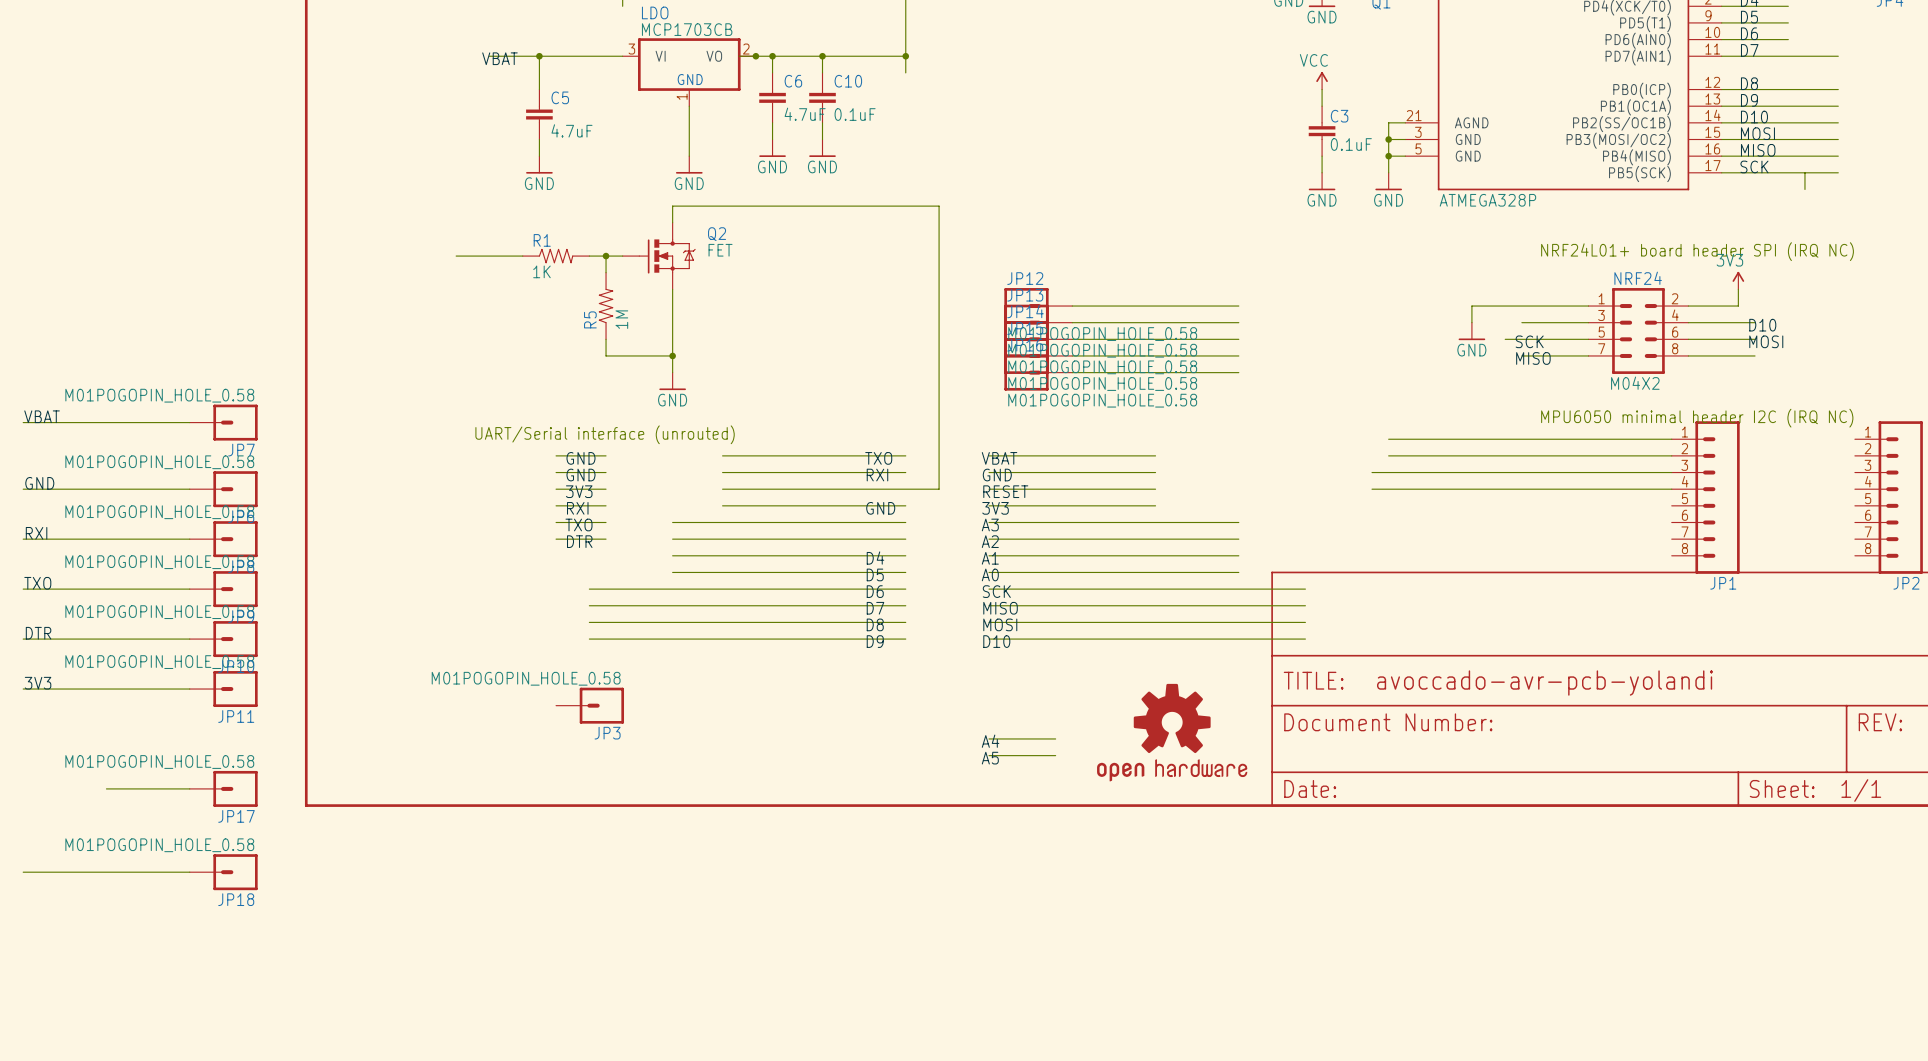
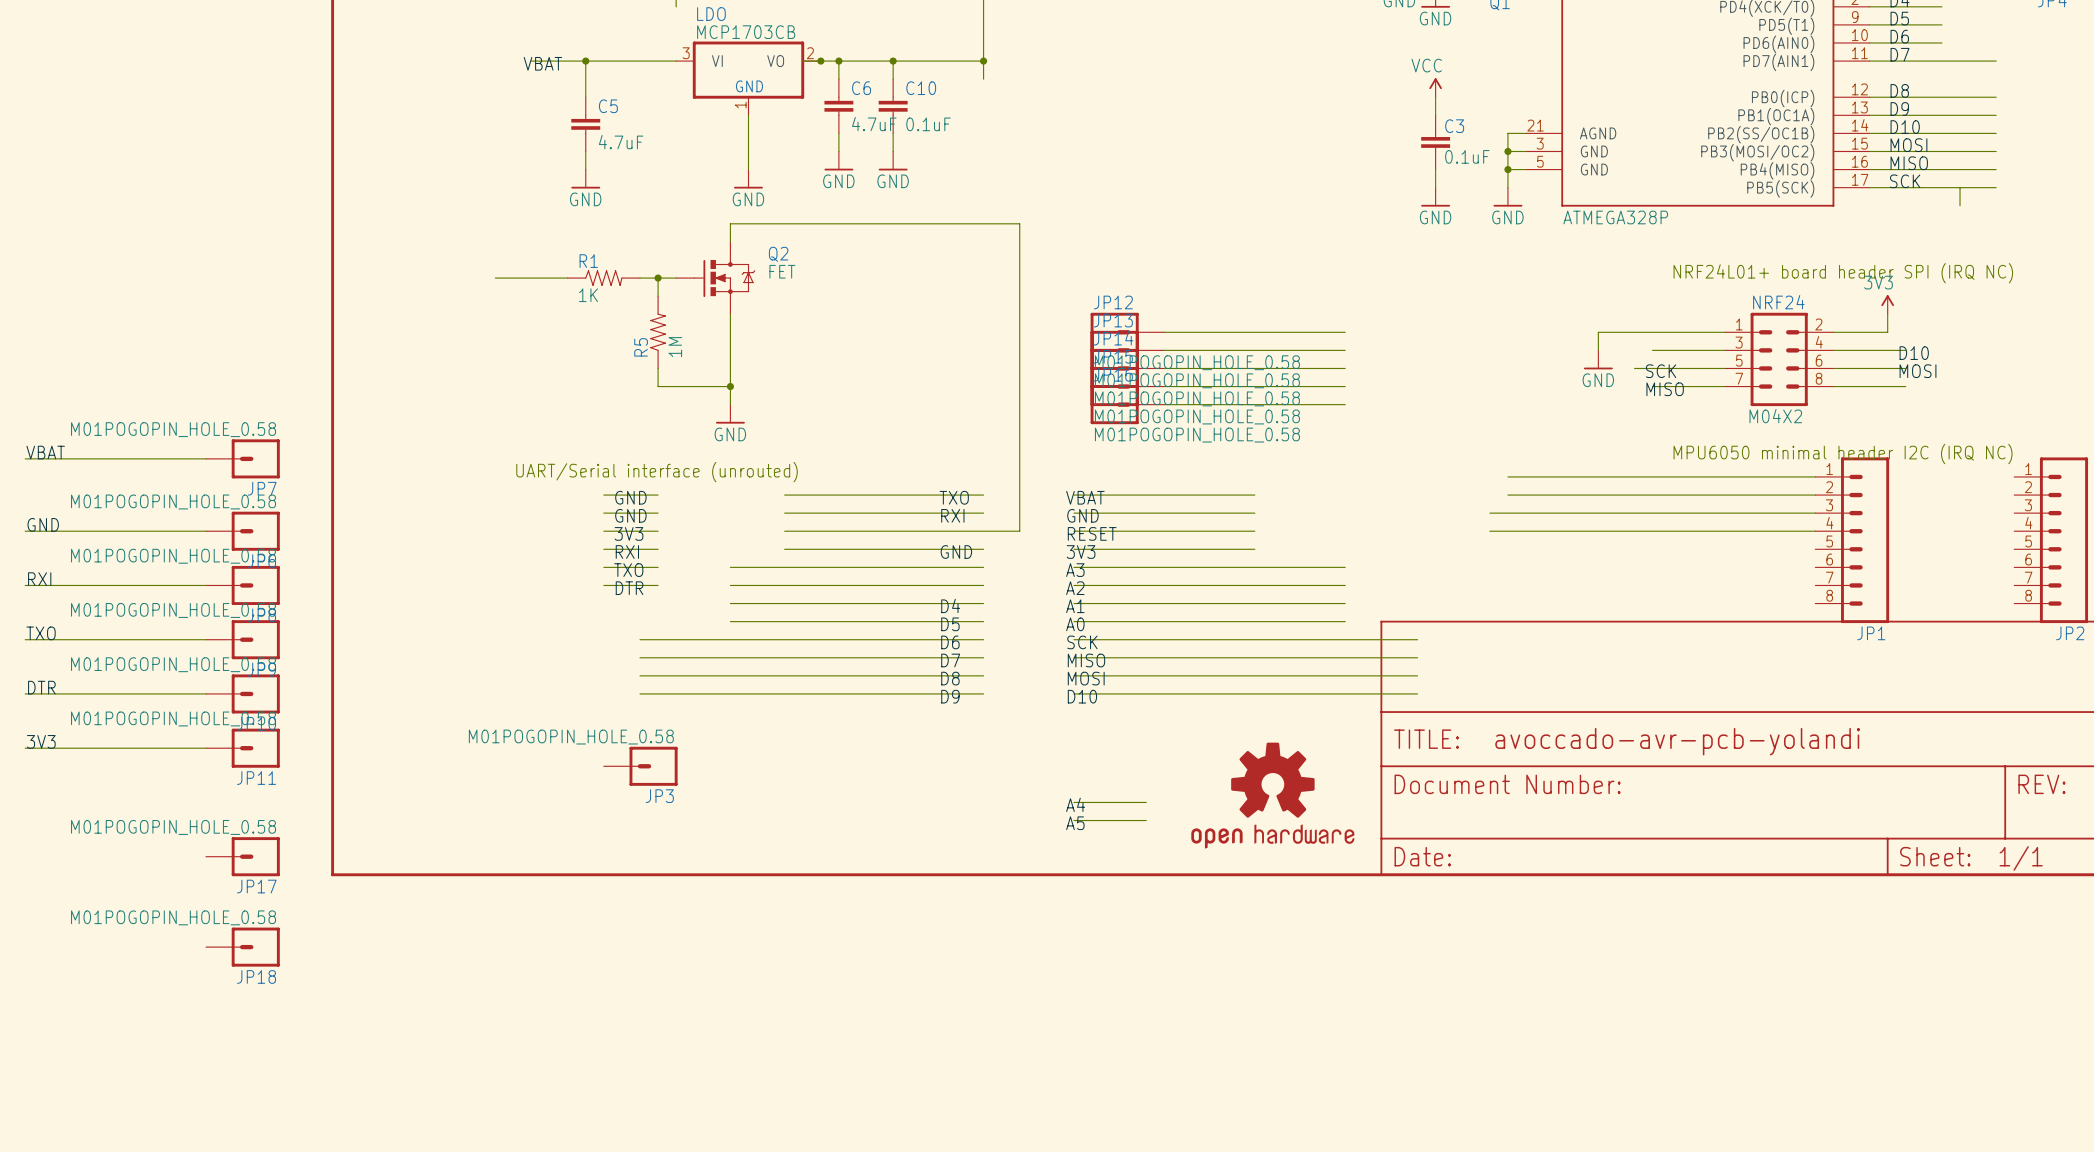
wire: (106, 788) (189, 788) -> none
wire: (23, 872) (189, 872) -> none

